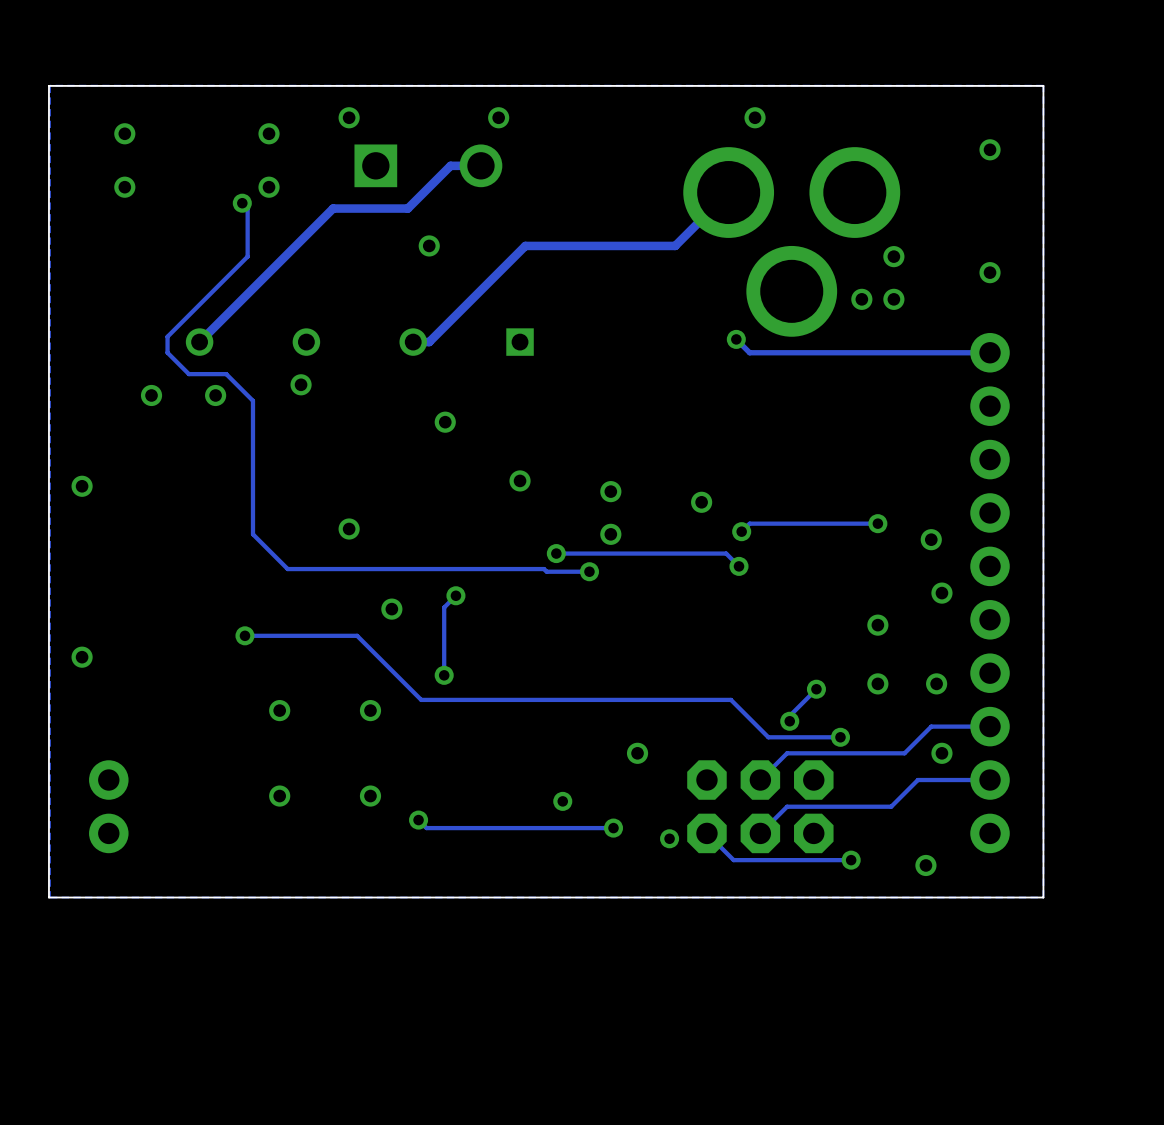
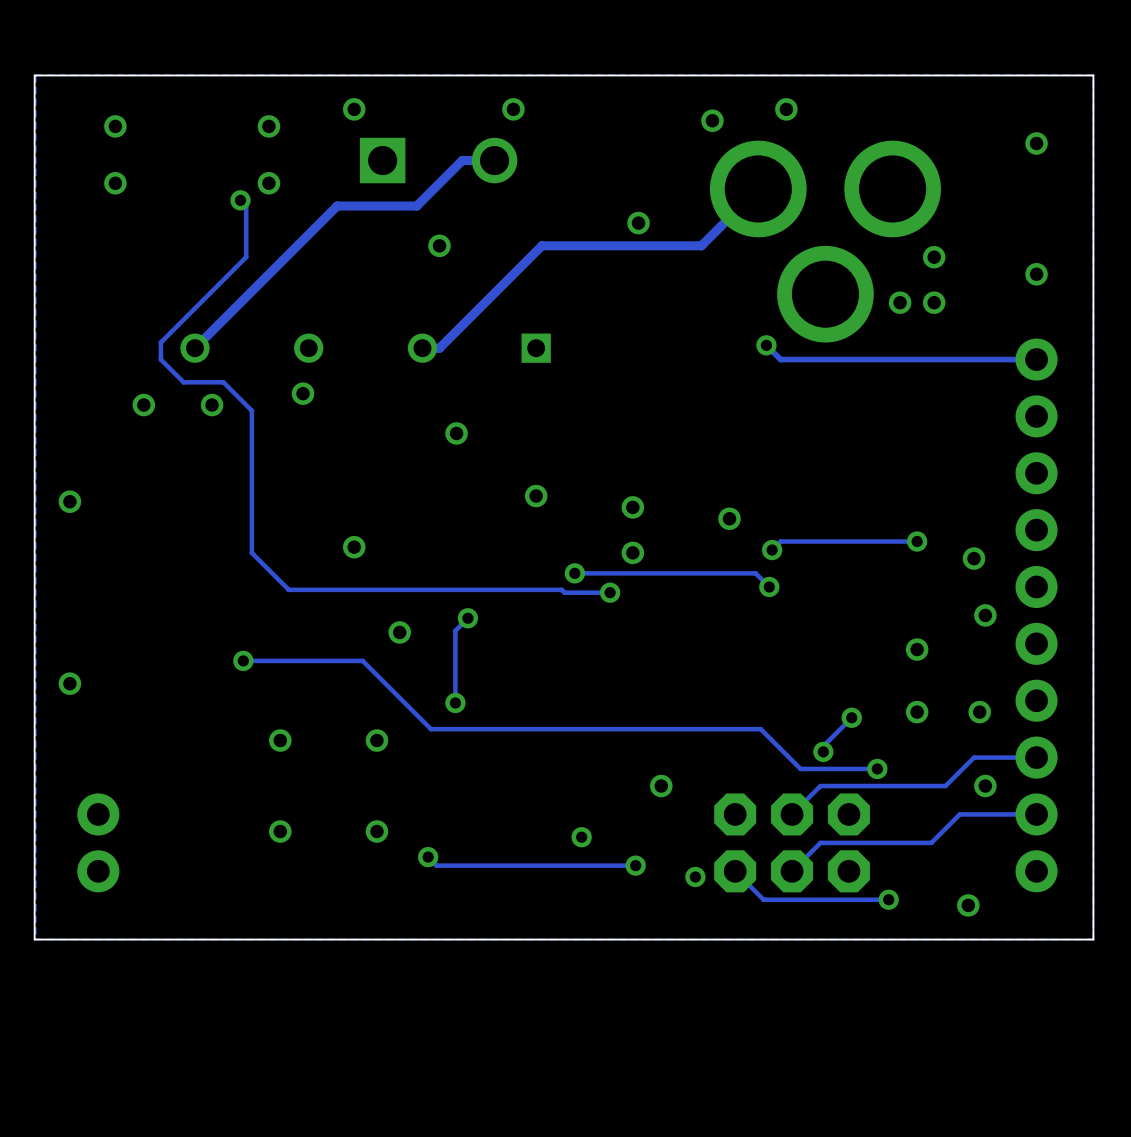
via: none -> (712, 120)
via: none -> (638, 223)

